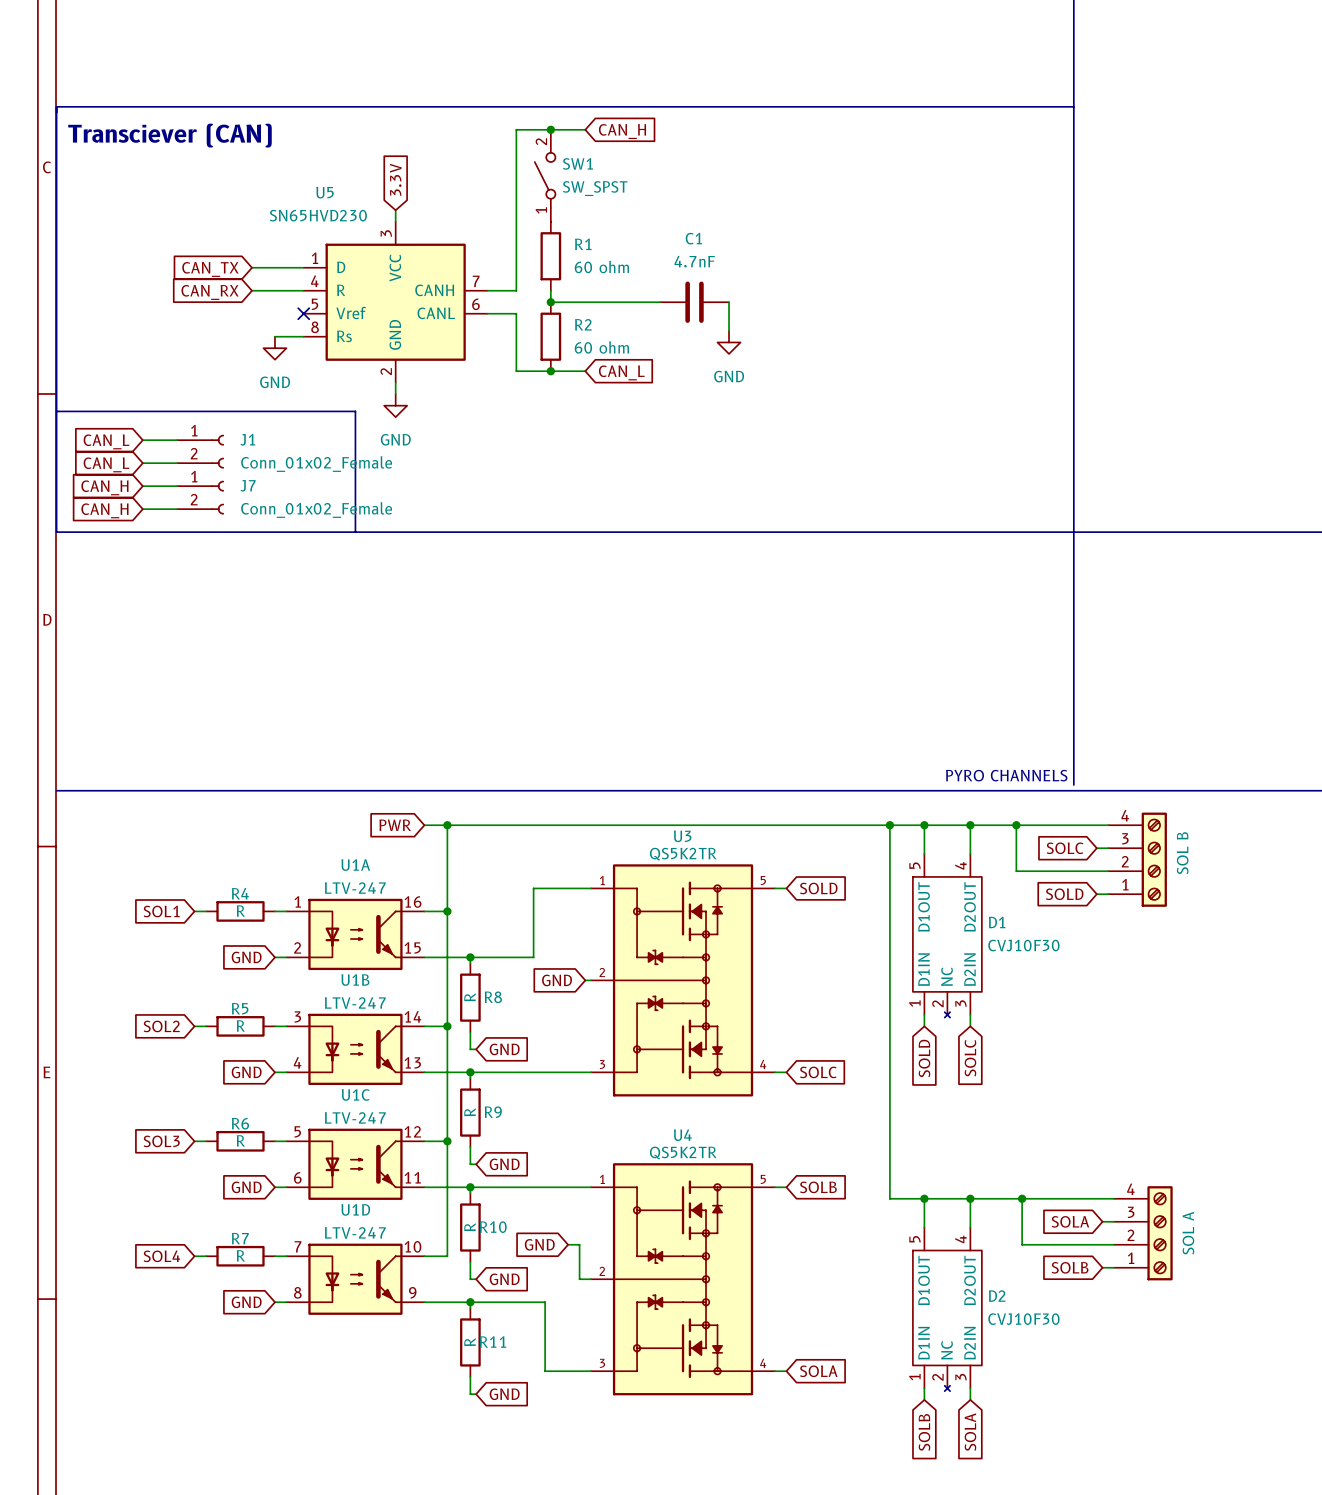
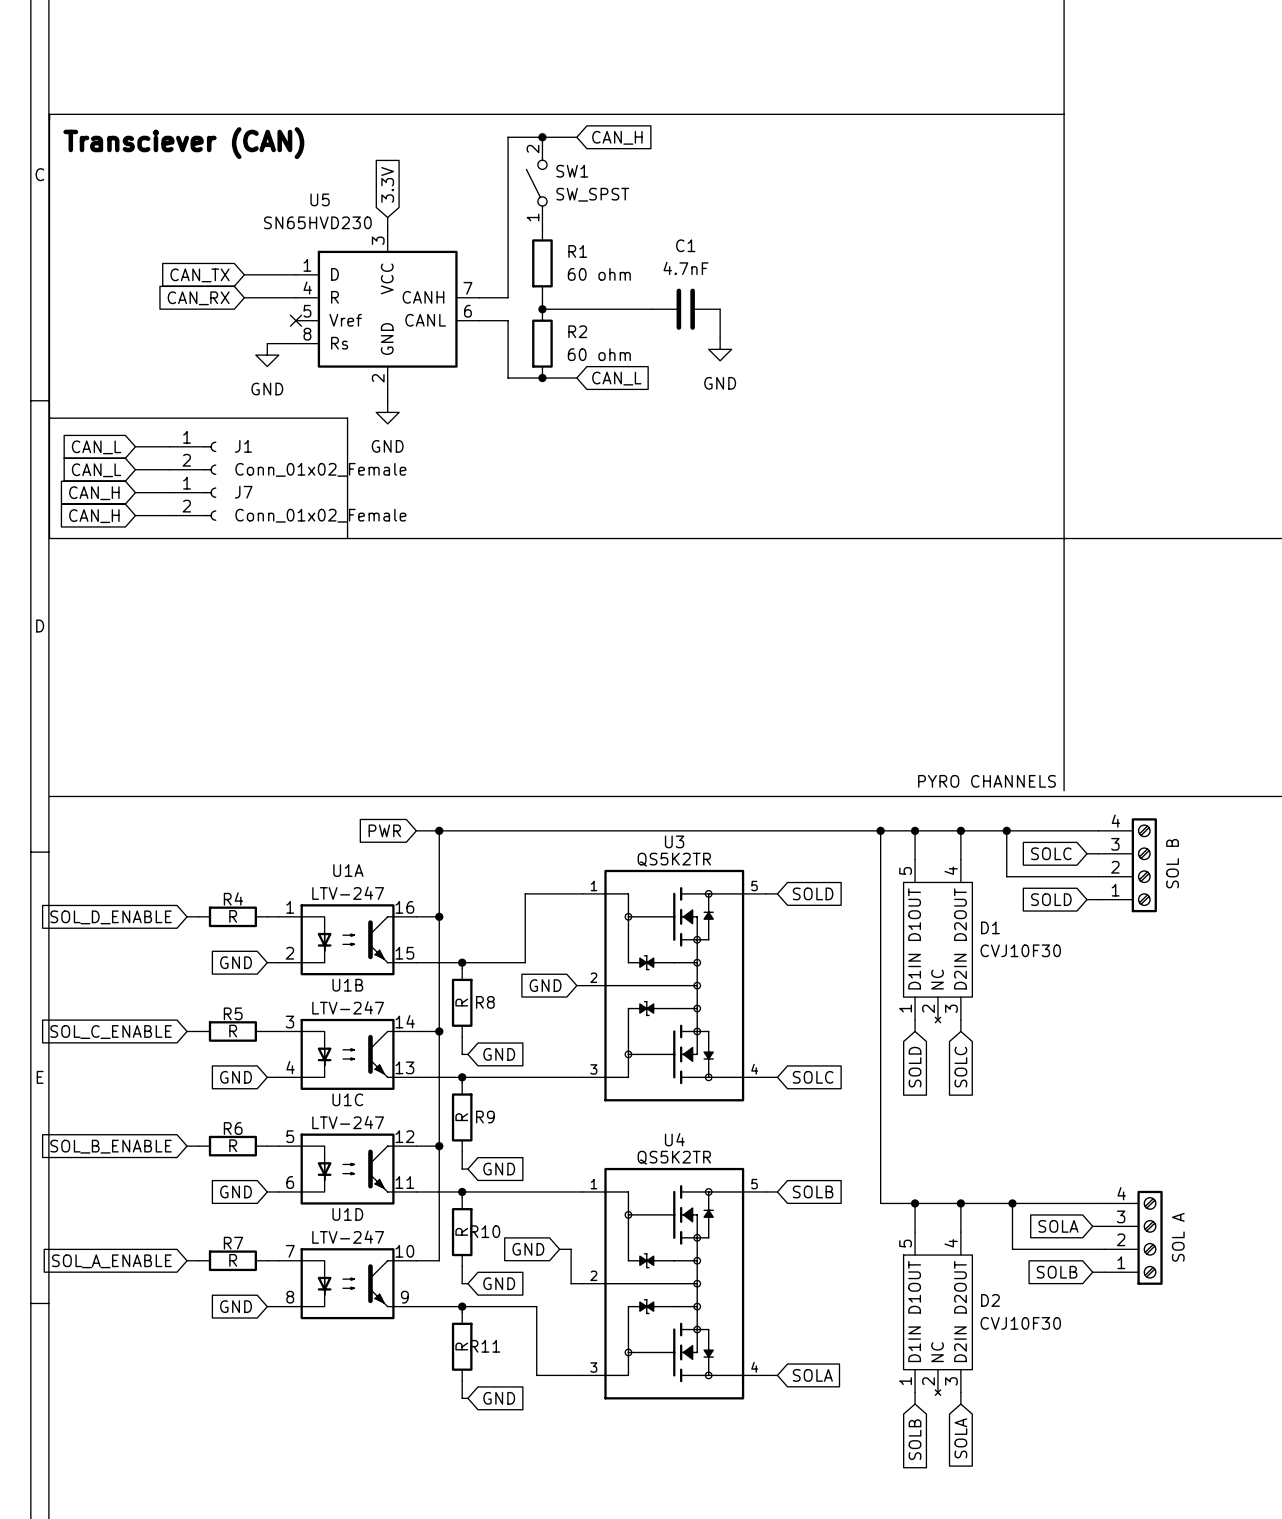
global label: SOL1 (161, 911) -> SOL_D_ENABLE (111, 917)
global label: SOL2 (161, 1026) -> SOL_C_ENABLE (111, 1032)
global label: SOL3 (161, 1141) -> SOL_B_ENABLE (111, 1146)
global label: SOL4 (161, 1256) -> SOL_A_ENABLE (111, 1261)

